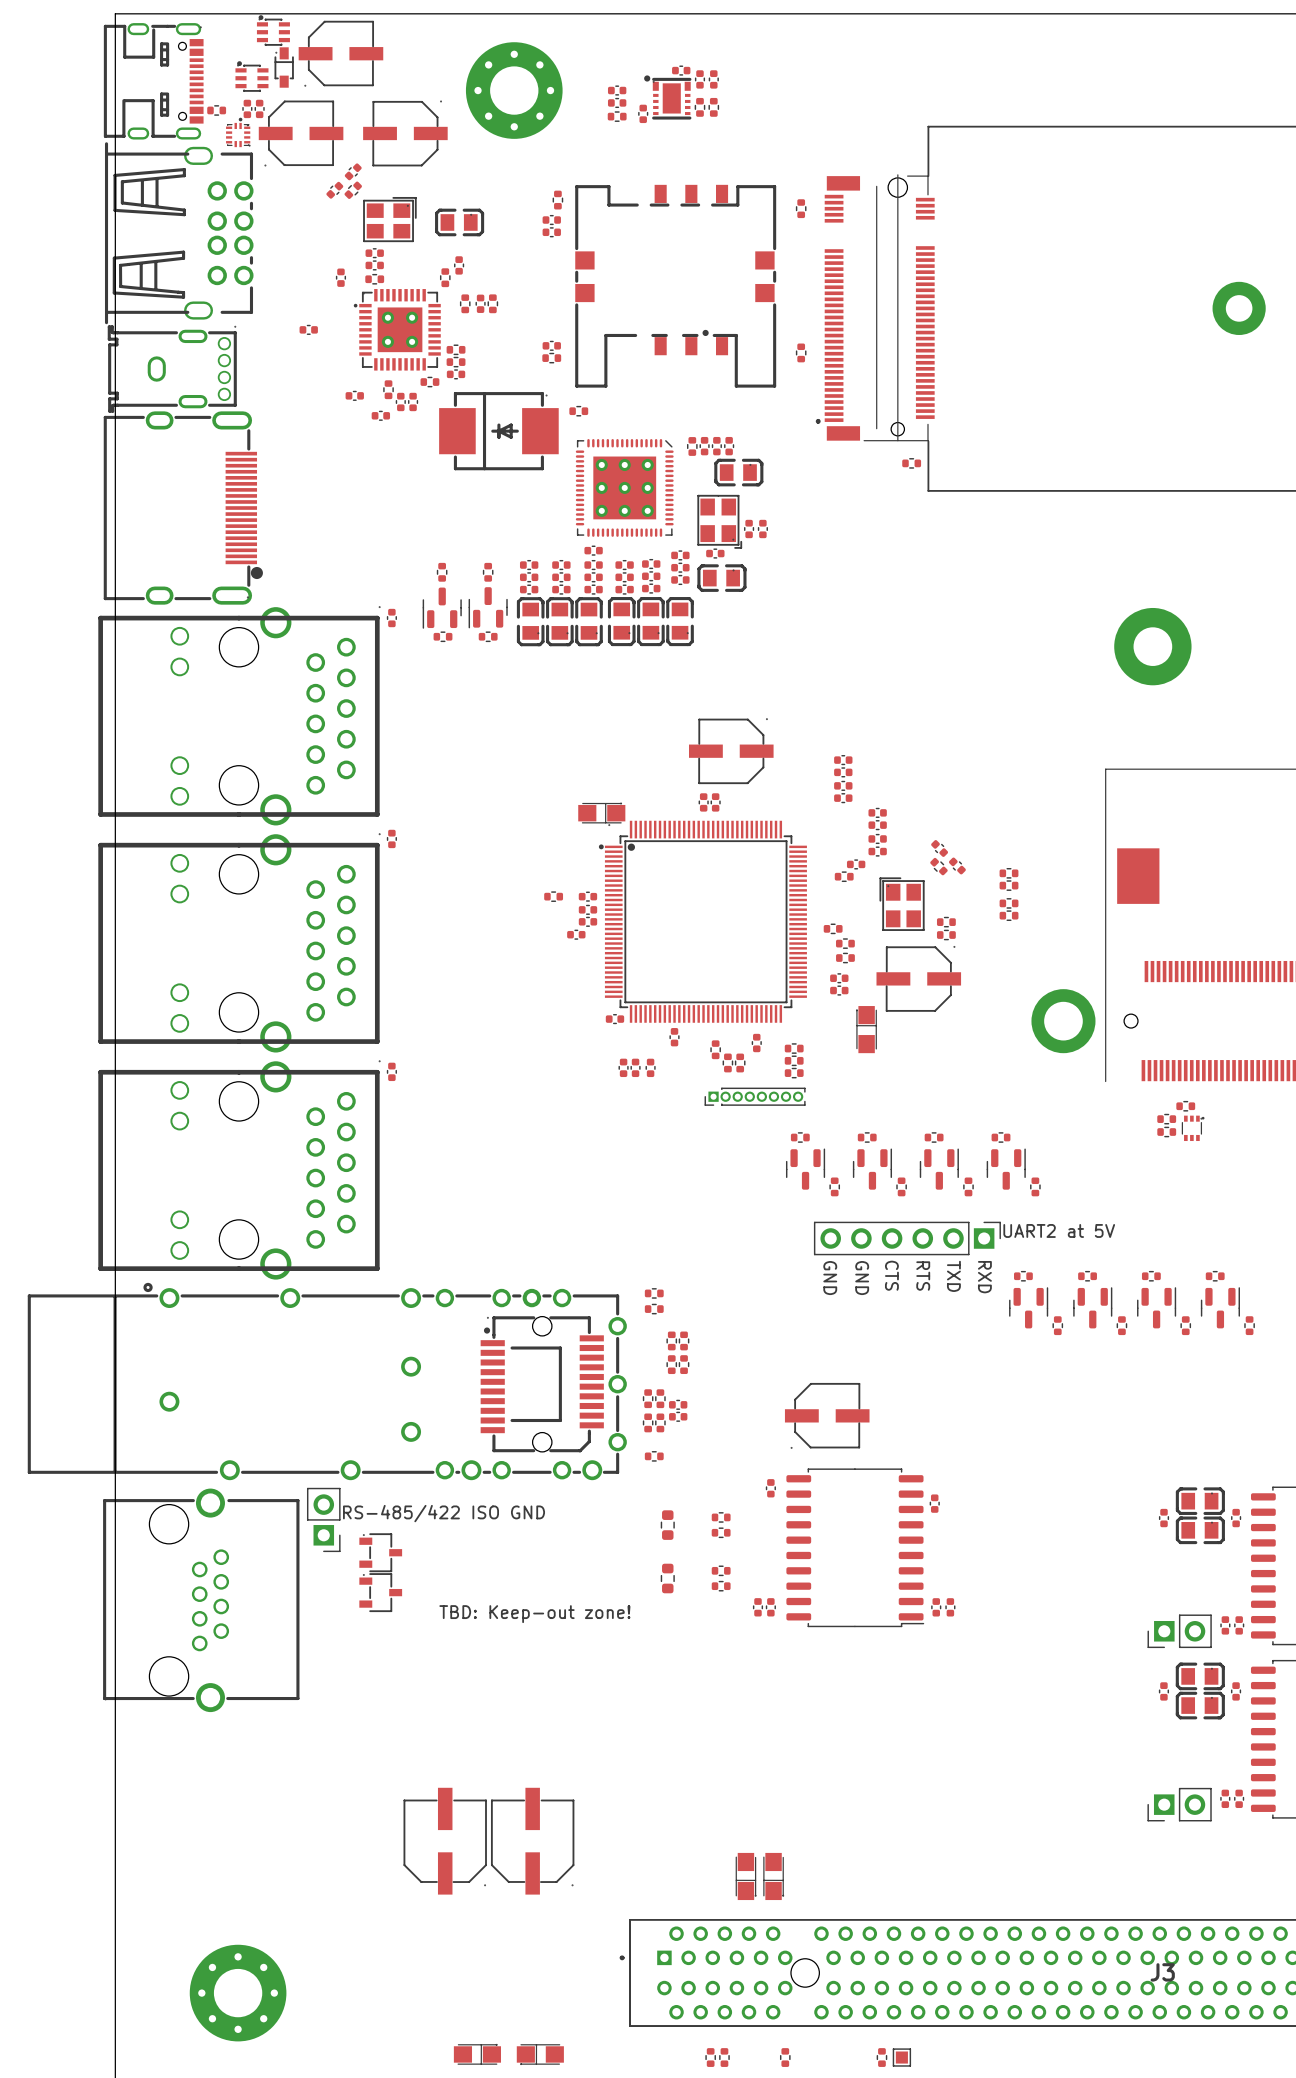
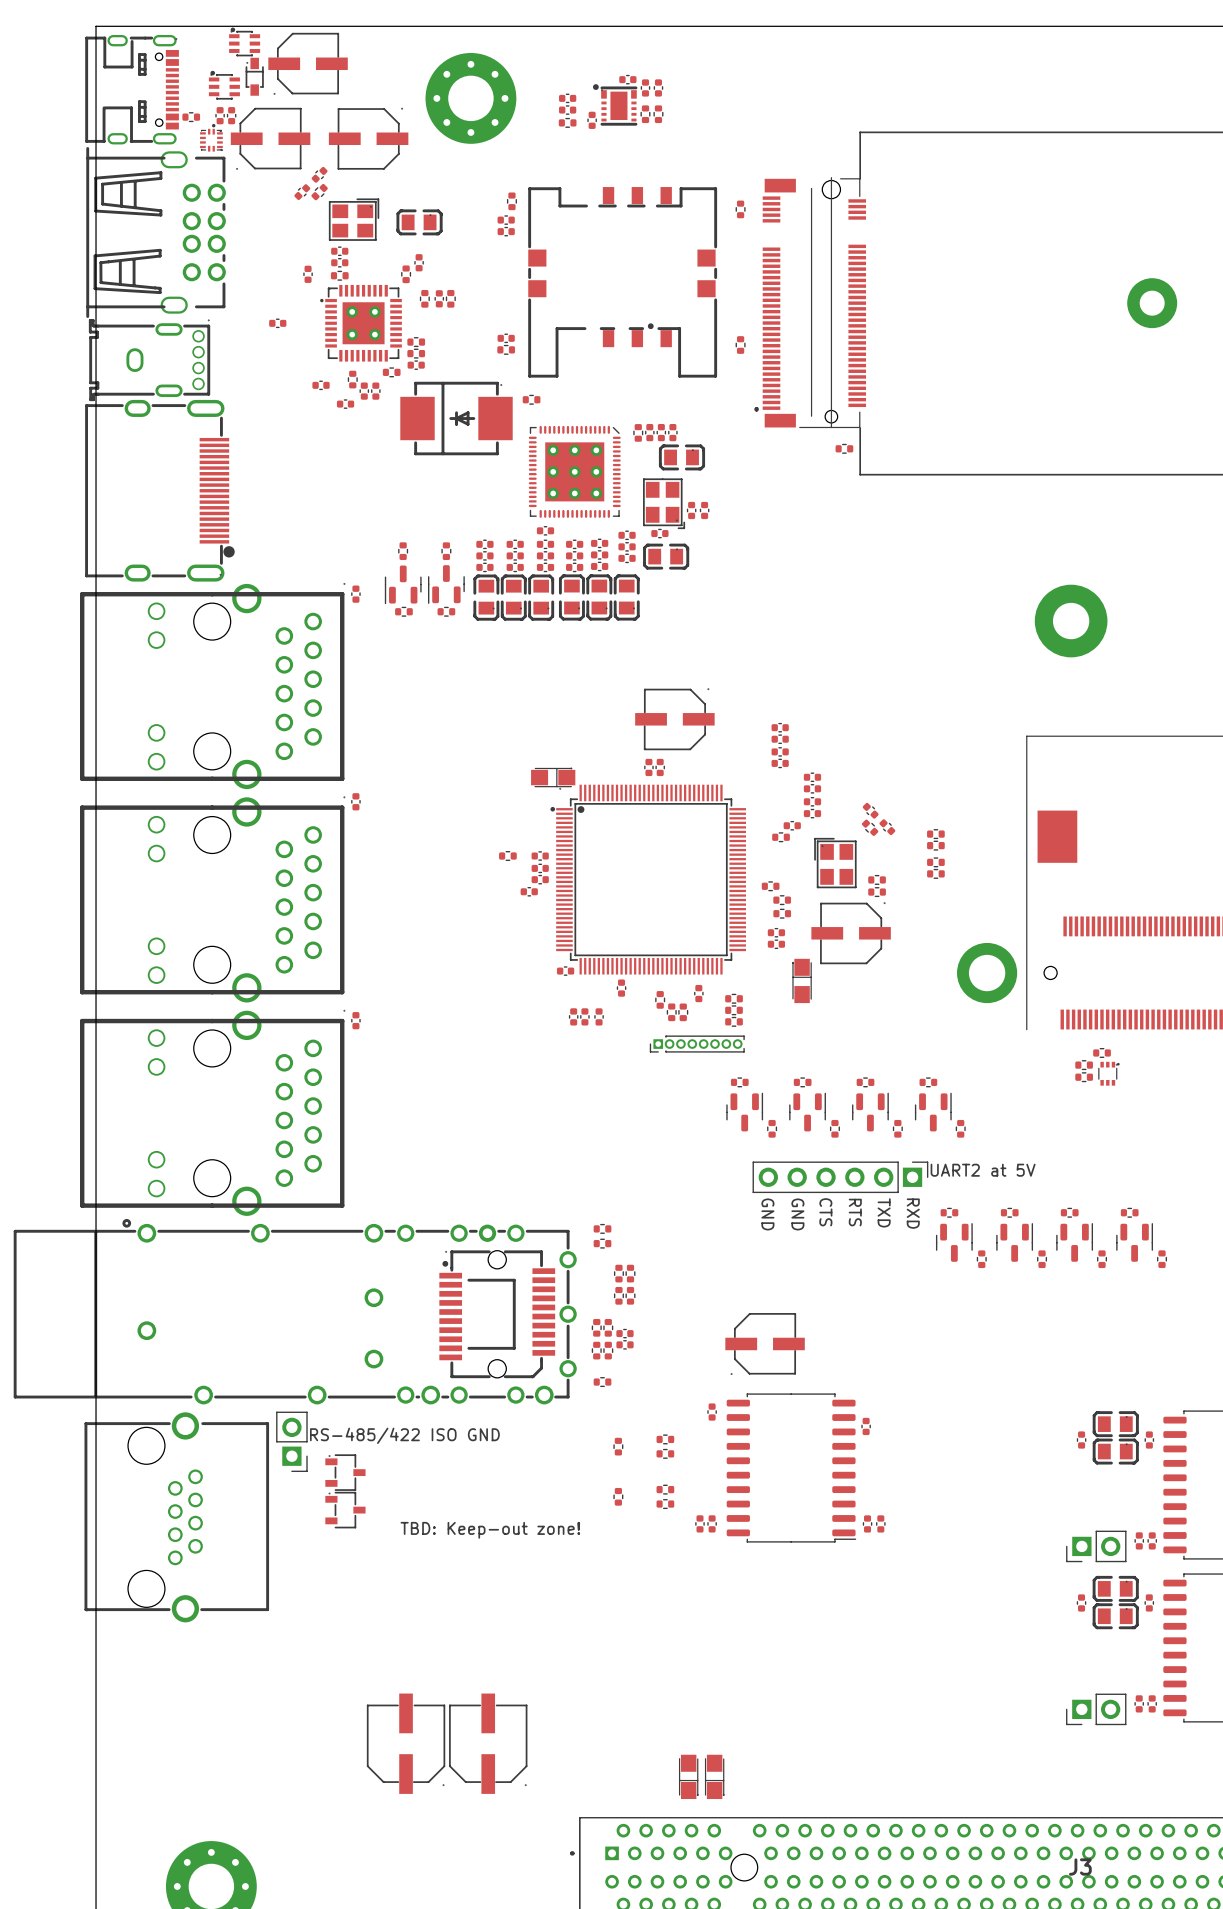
part footprint: [660, 1510, 675, 1540] -> [613, 1437, 624, 1456]
part footprint: [660, 1563, 675, 1594] -> [613, 1487, 624, 1506]

